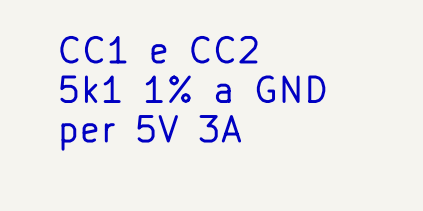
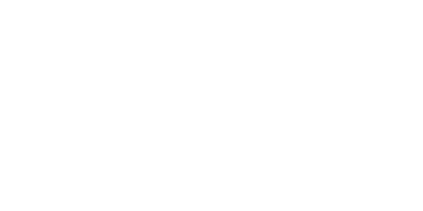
text: CC1 e CC2 (158, 49) -> none
text: 5k1 1% a GND (192, 89) -> none
text: per 5V 3A (151, 132) -> none

